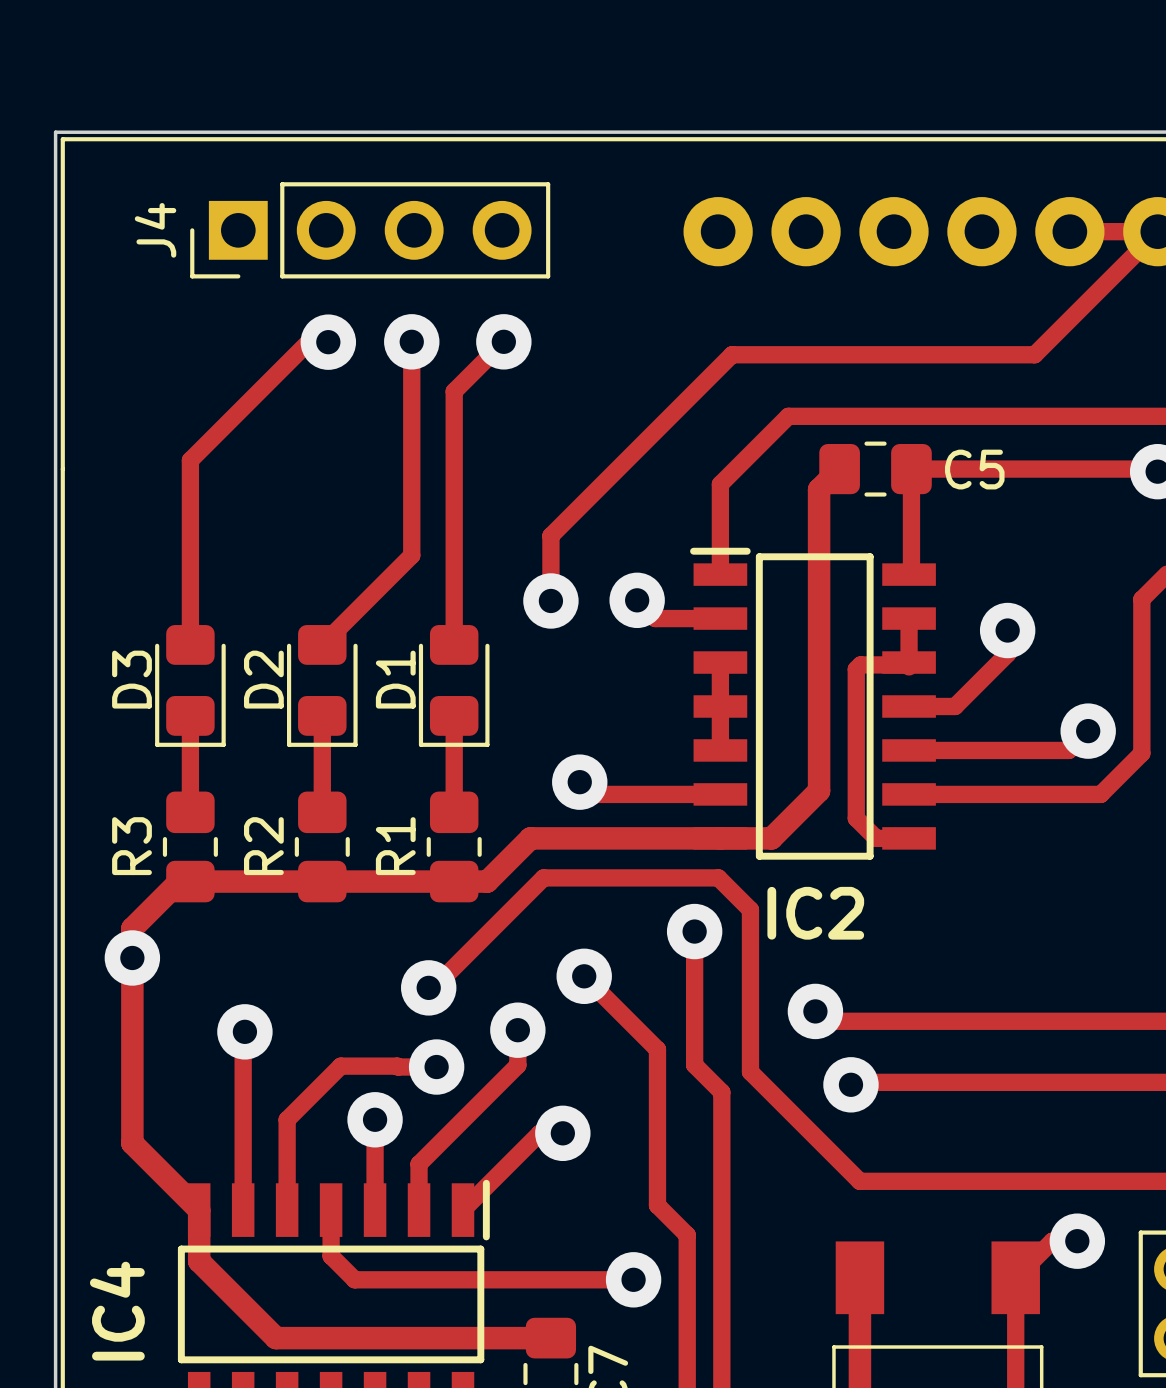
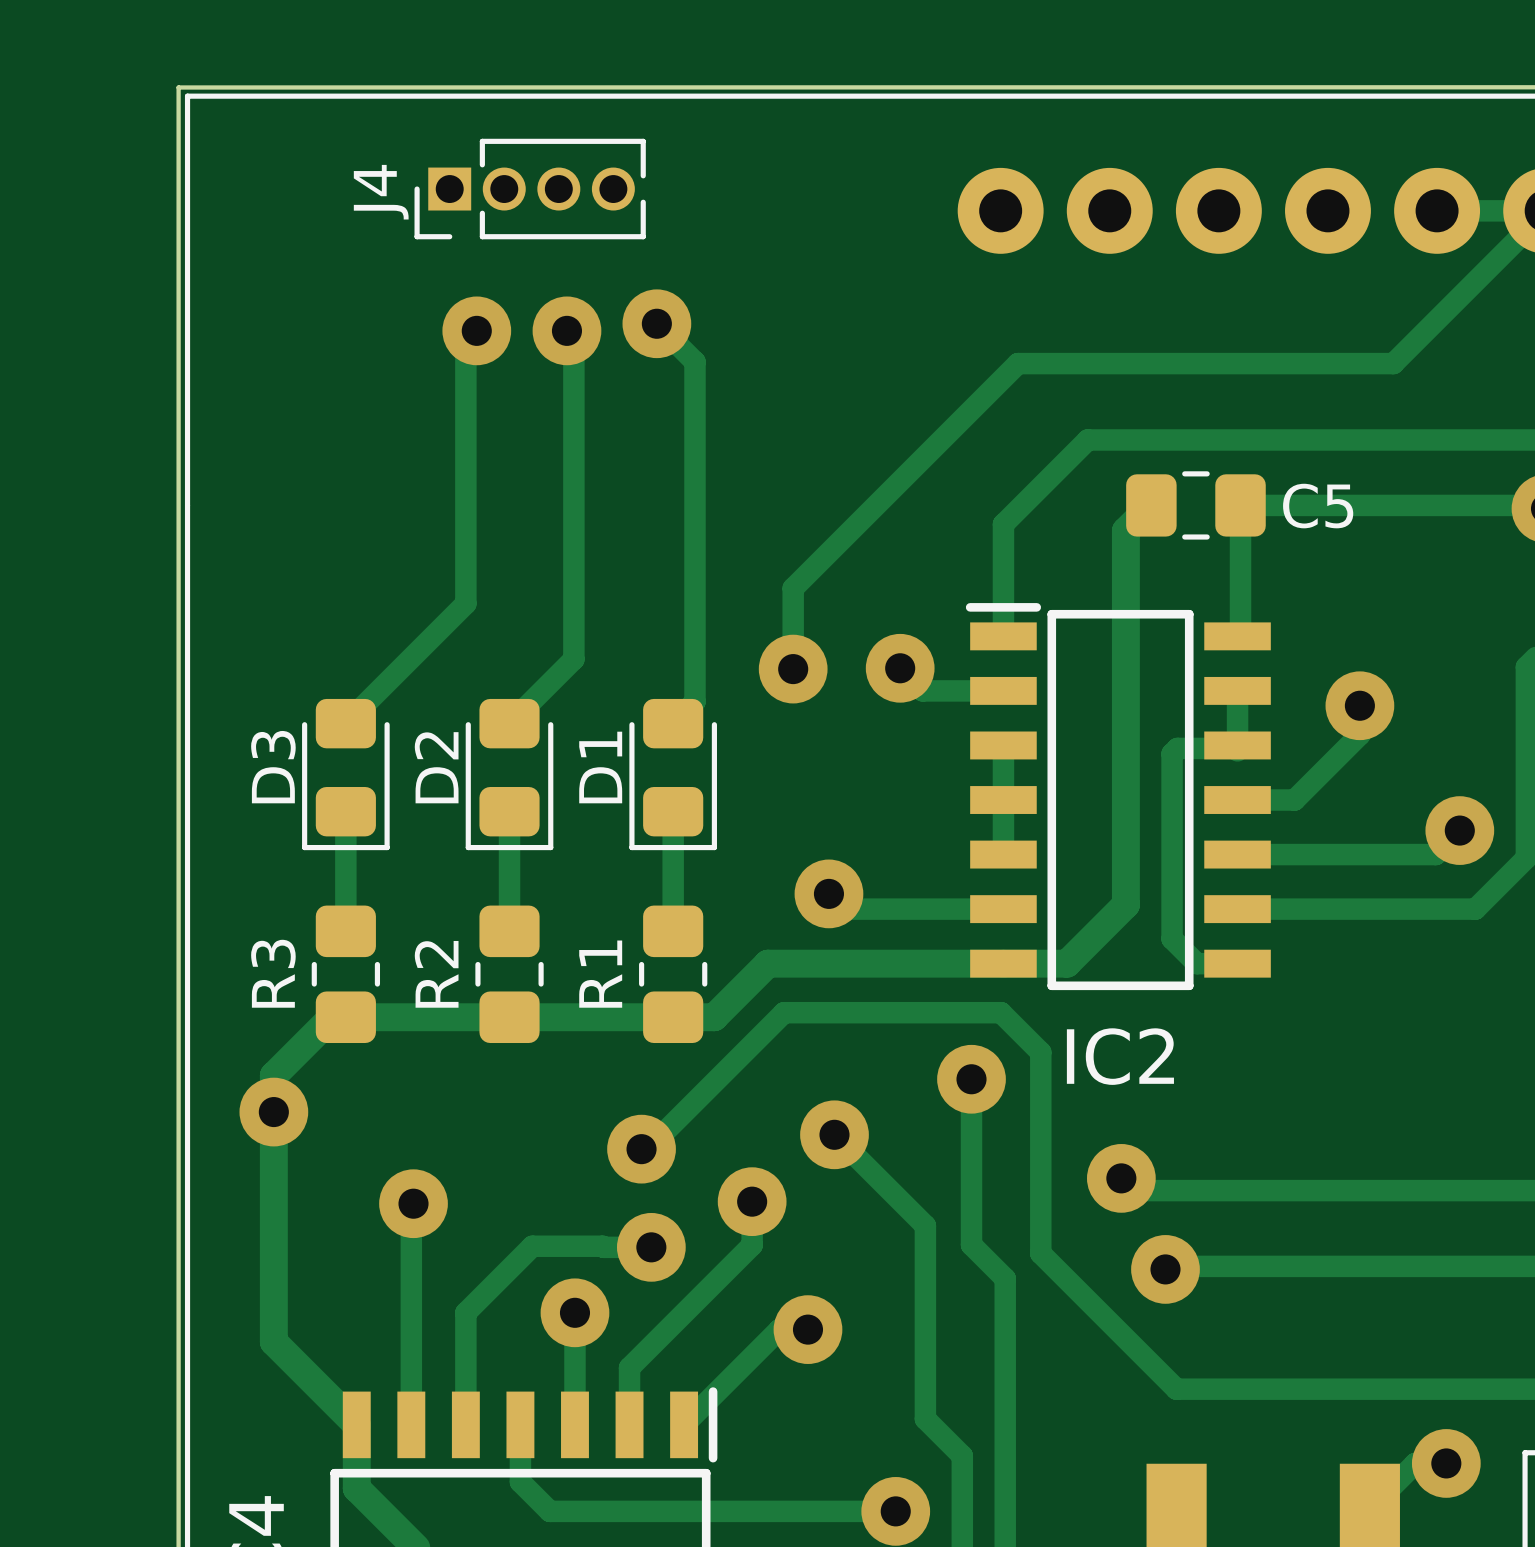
J4 footprint: [190, 182, 551, 279] -> [414, 138, 646, 240]
J4 name position: J4 (155, 230) -> J4 (381, 192)
via: none -> (656, 323)
via: none -> (476, 330)
via: none -> (566, 330)
track: (411, 341) (411, 555) (374, 593) -> (566, 330) (573, 337) (573, 659)
via: (411, 341) -> none
track: (503, 341) (454, 391) (454, 644) -> (656, 323) (694, 361) (694, 701) (673, 723)
via: (503, 341) -> none
track: (328, 342) (308, 342) (190, 460) (190, 644) -> (465, 341) (465, 603) (345, 723)
via: (328, 342) -> none

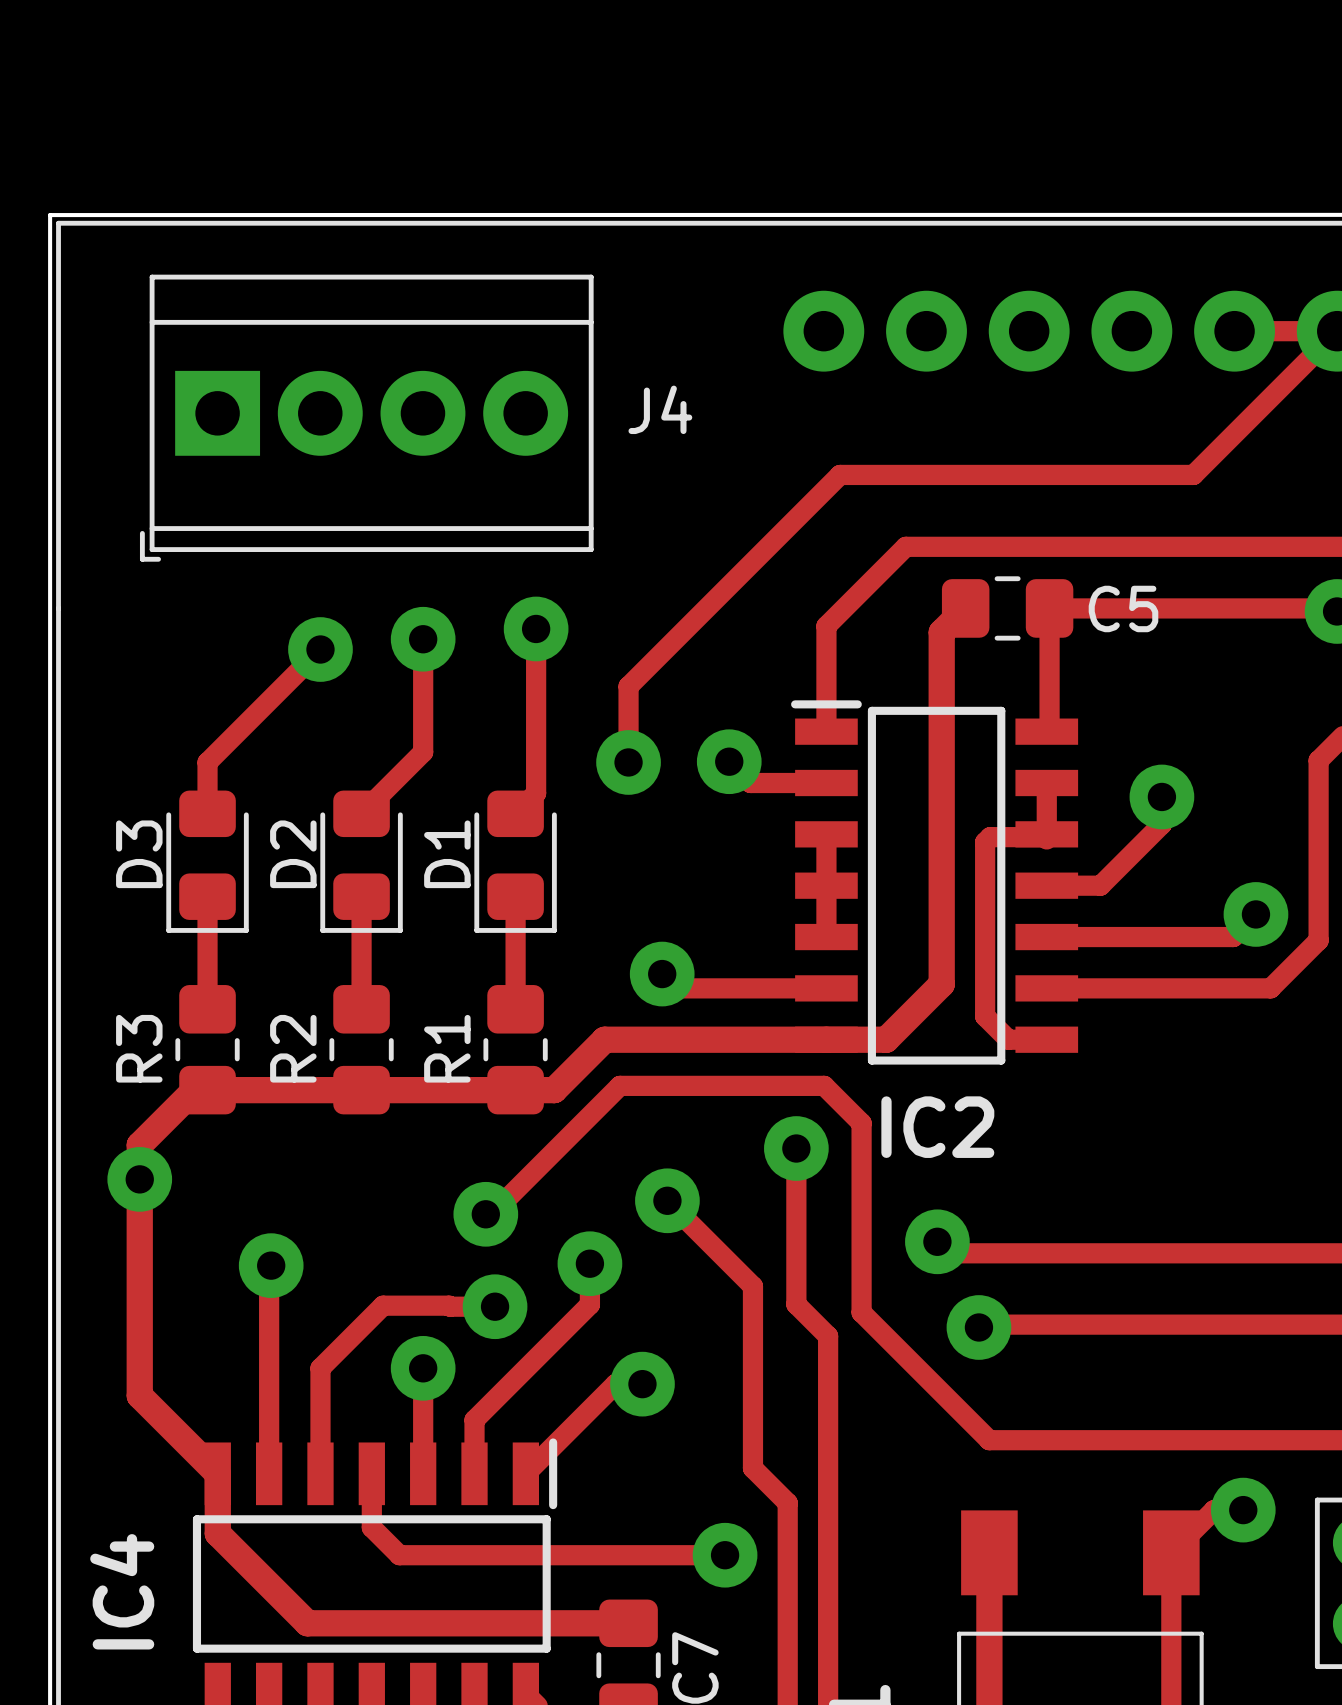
J4 footprint: [414, 138, 646, 240] -> [139, 274, 594, 562]
J4 name position: J4 (381, 192) -> J4 (660, 409)
track: (656, 323) (694, 361) (694, 527) -> none
via: (656, 323) -> none
via: (476, 330) -> none
track: (566, 330) (573, 337) (573, 659) -> (423, 639) (422, 753)
via: (566, 330) -> none
track: (465, 341) (465, 603) (345, 723) -> (320, 649) (207, 762) (207, 813)
via: none -> (536, 628)
via: none -> (423, 639)
via: none -> (320, 649)

